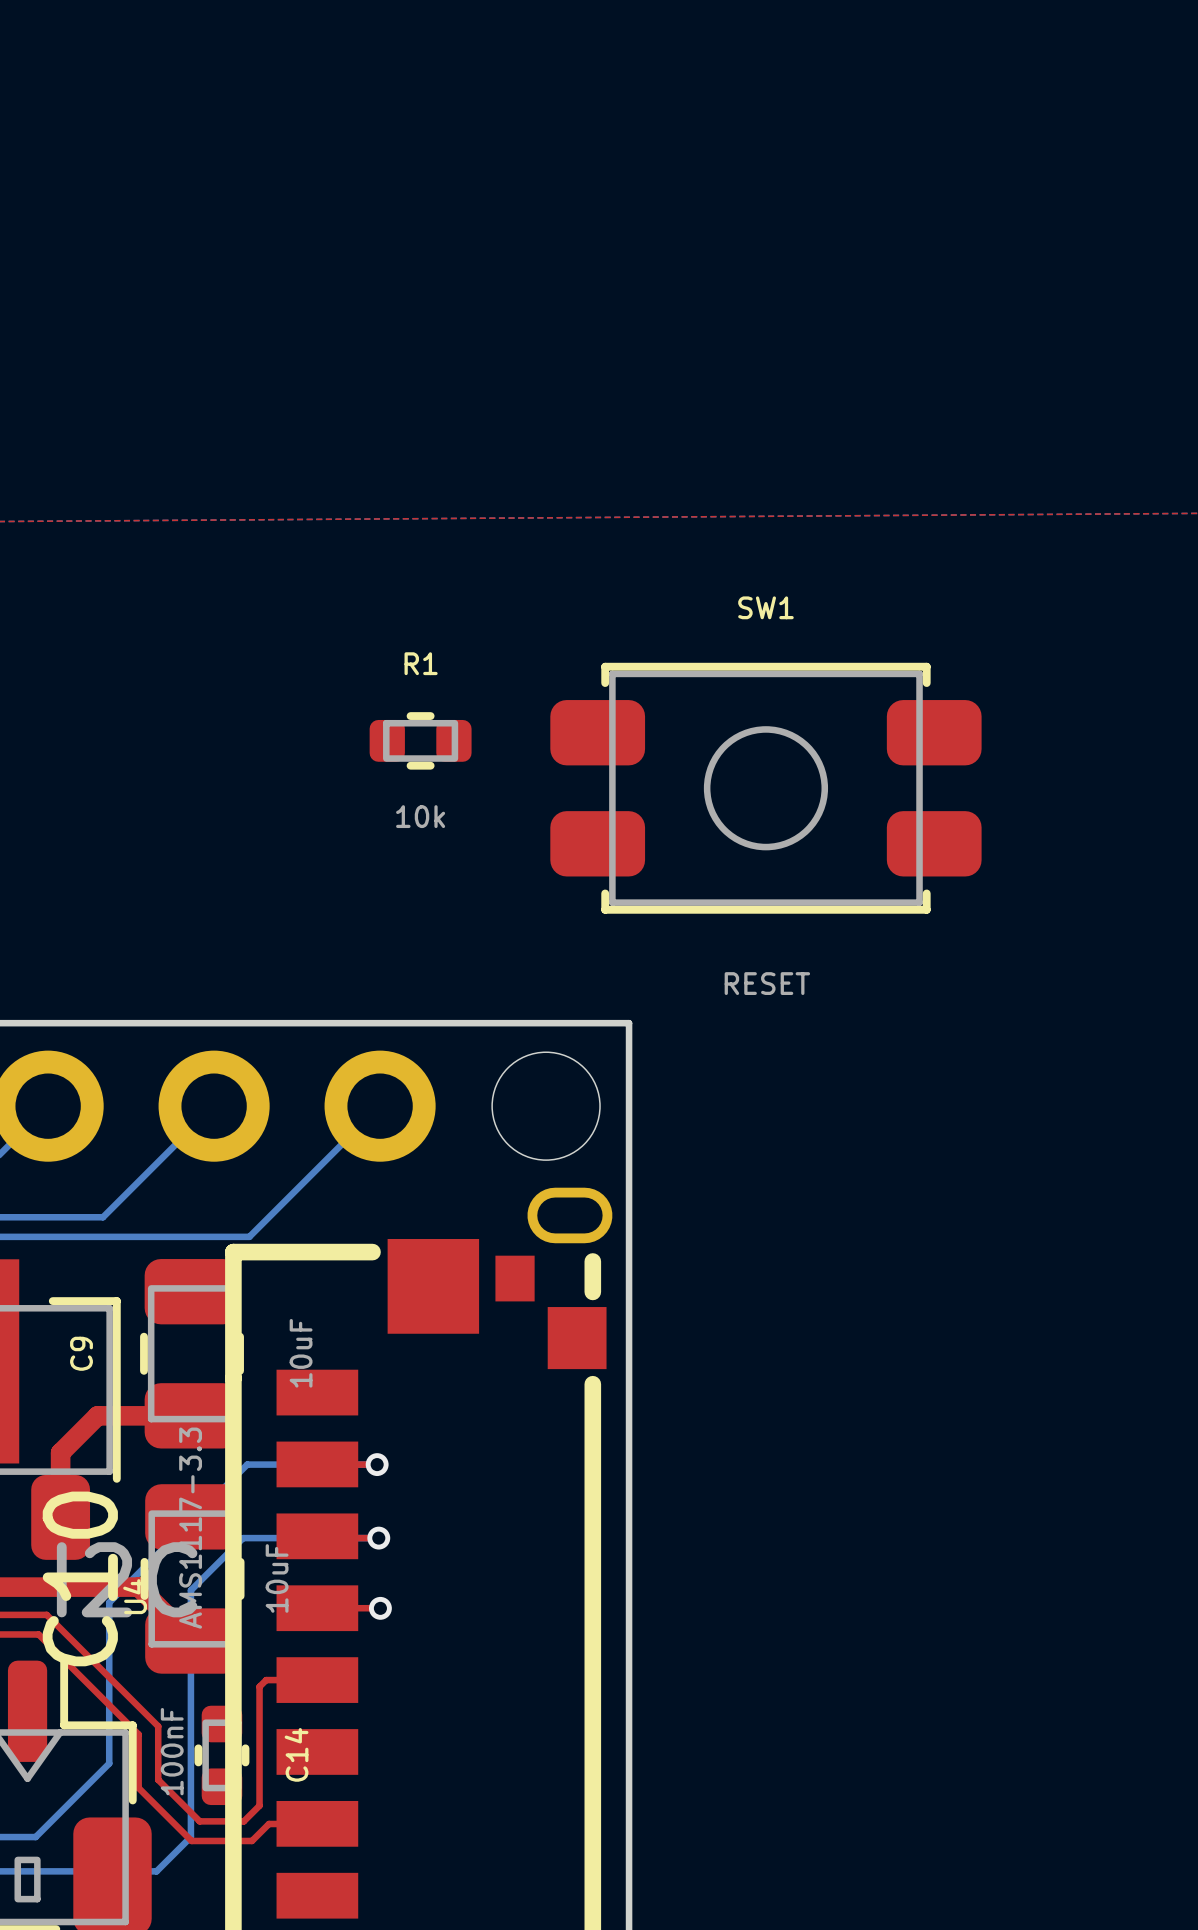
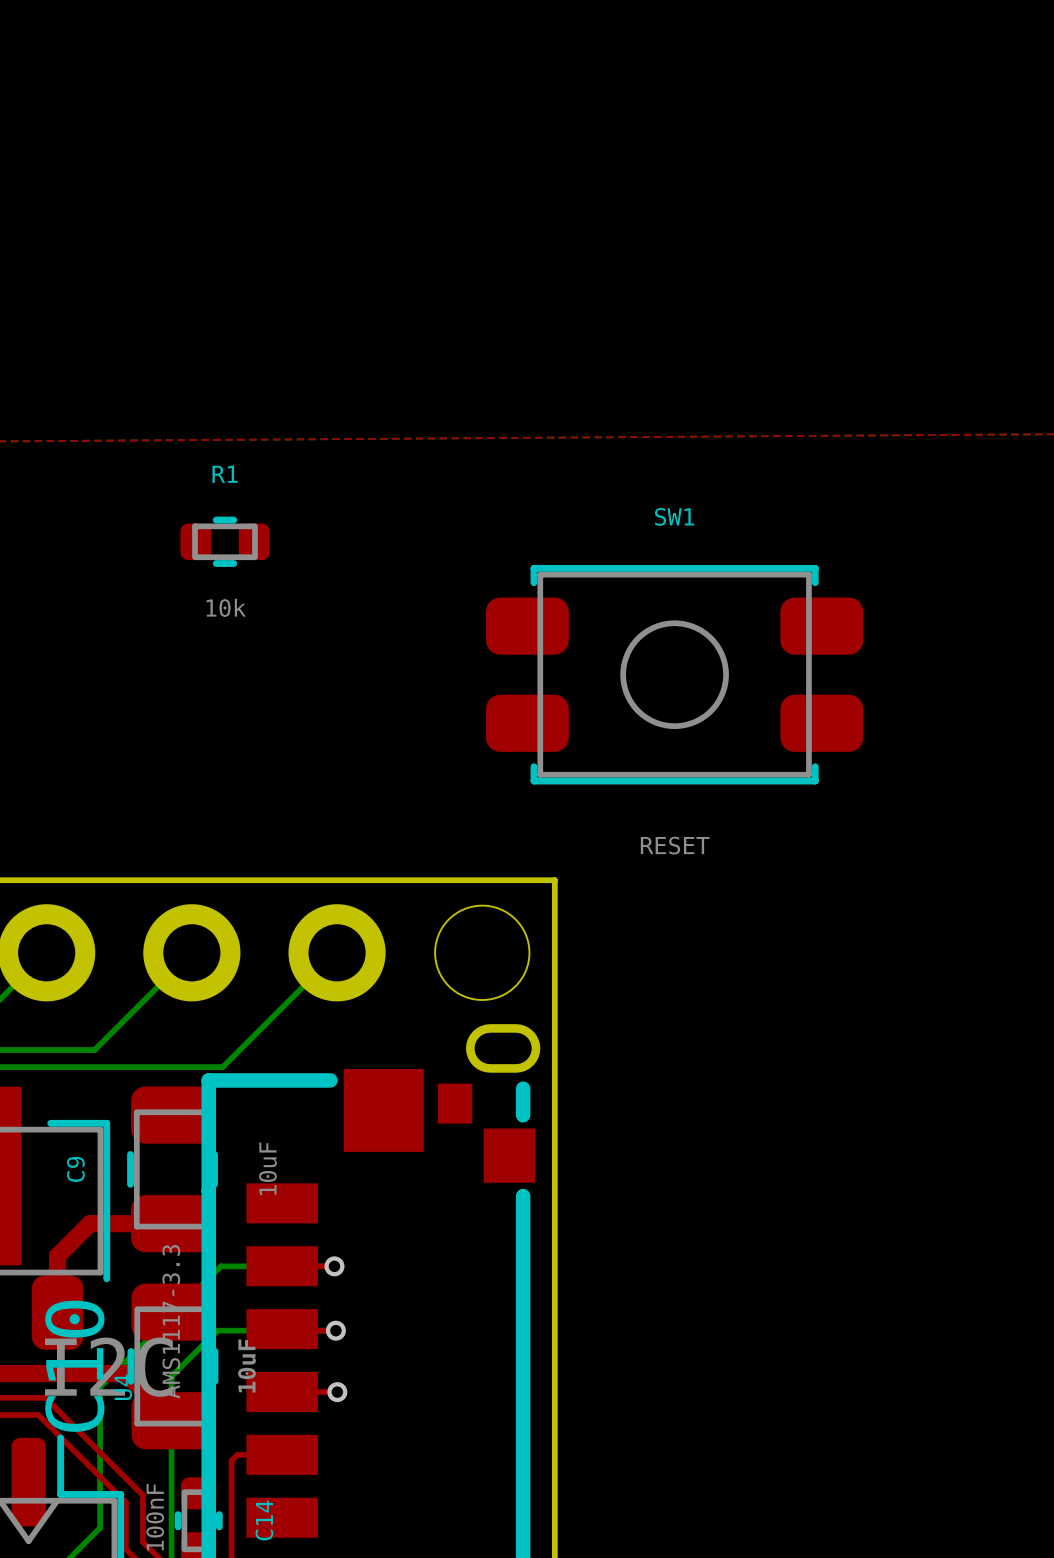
R1 position: (420, 740) -> (225, 541)

